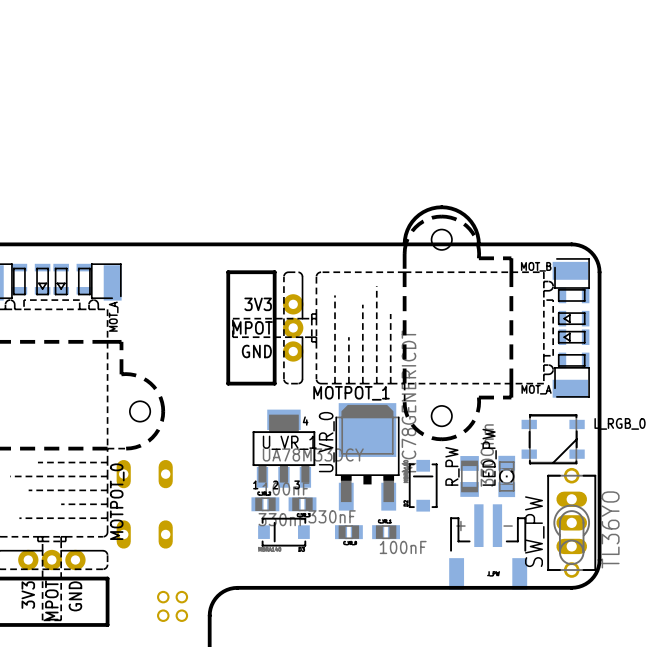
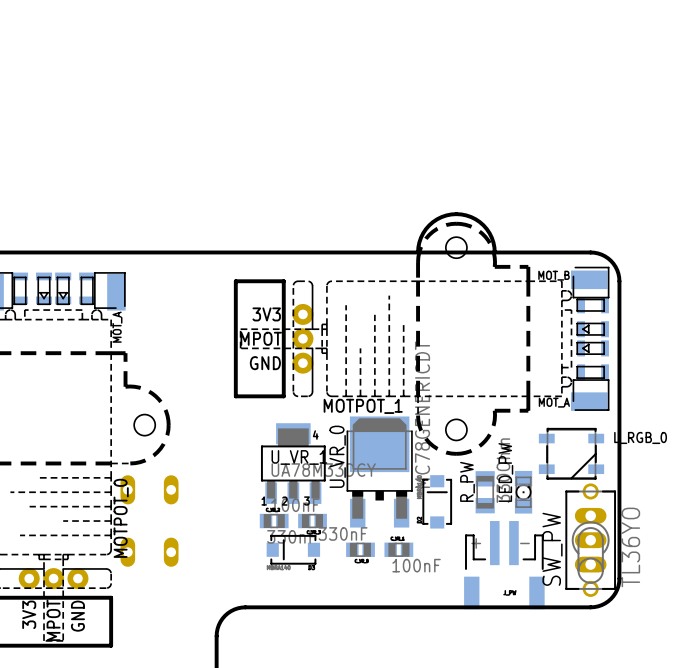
part: (172, 606) -> none

